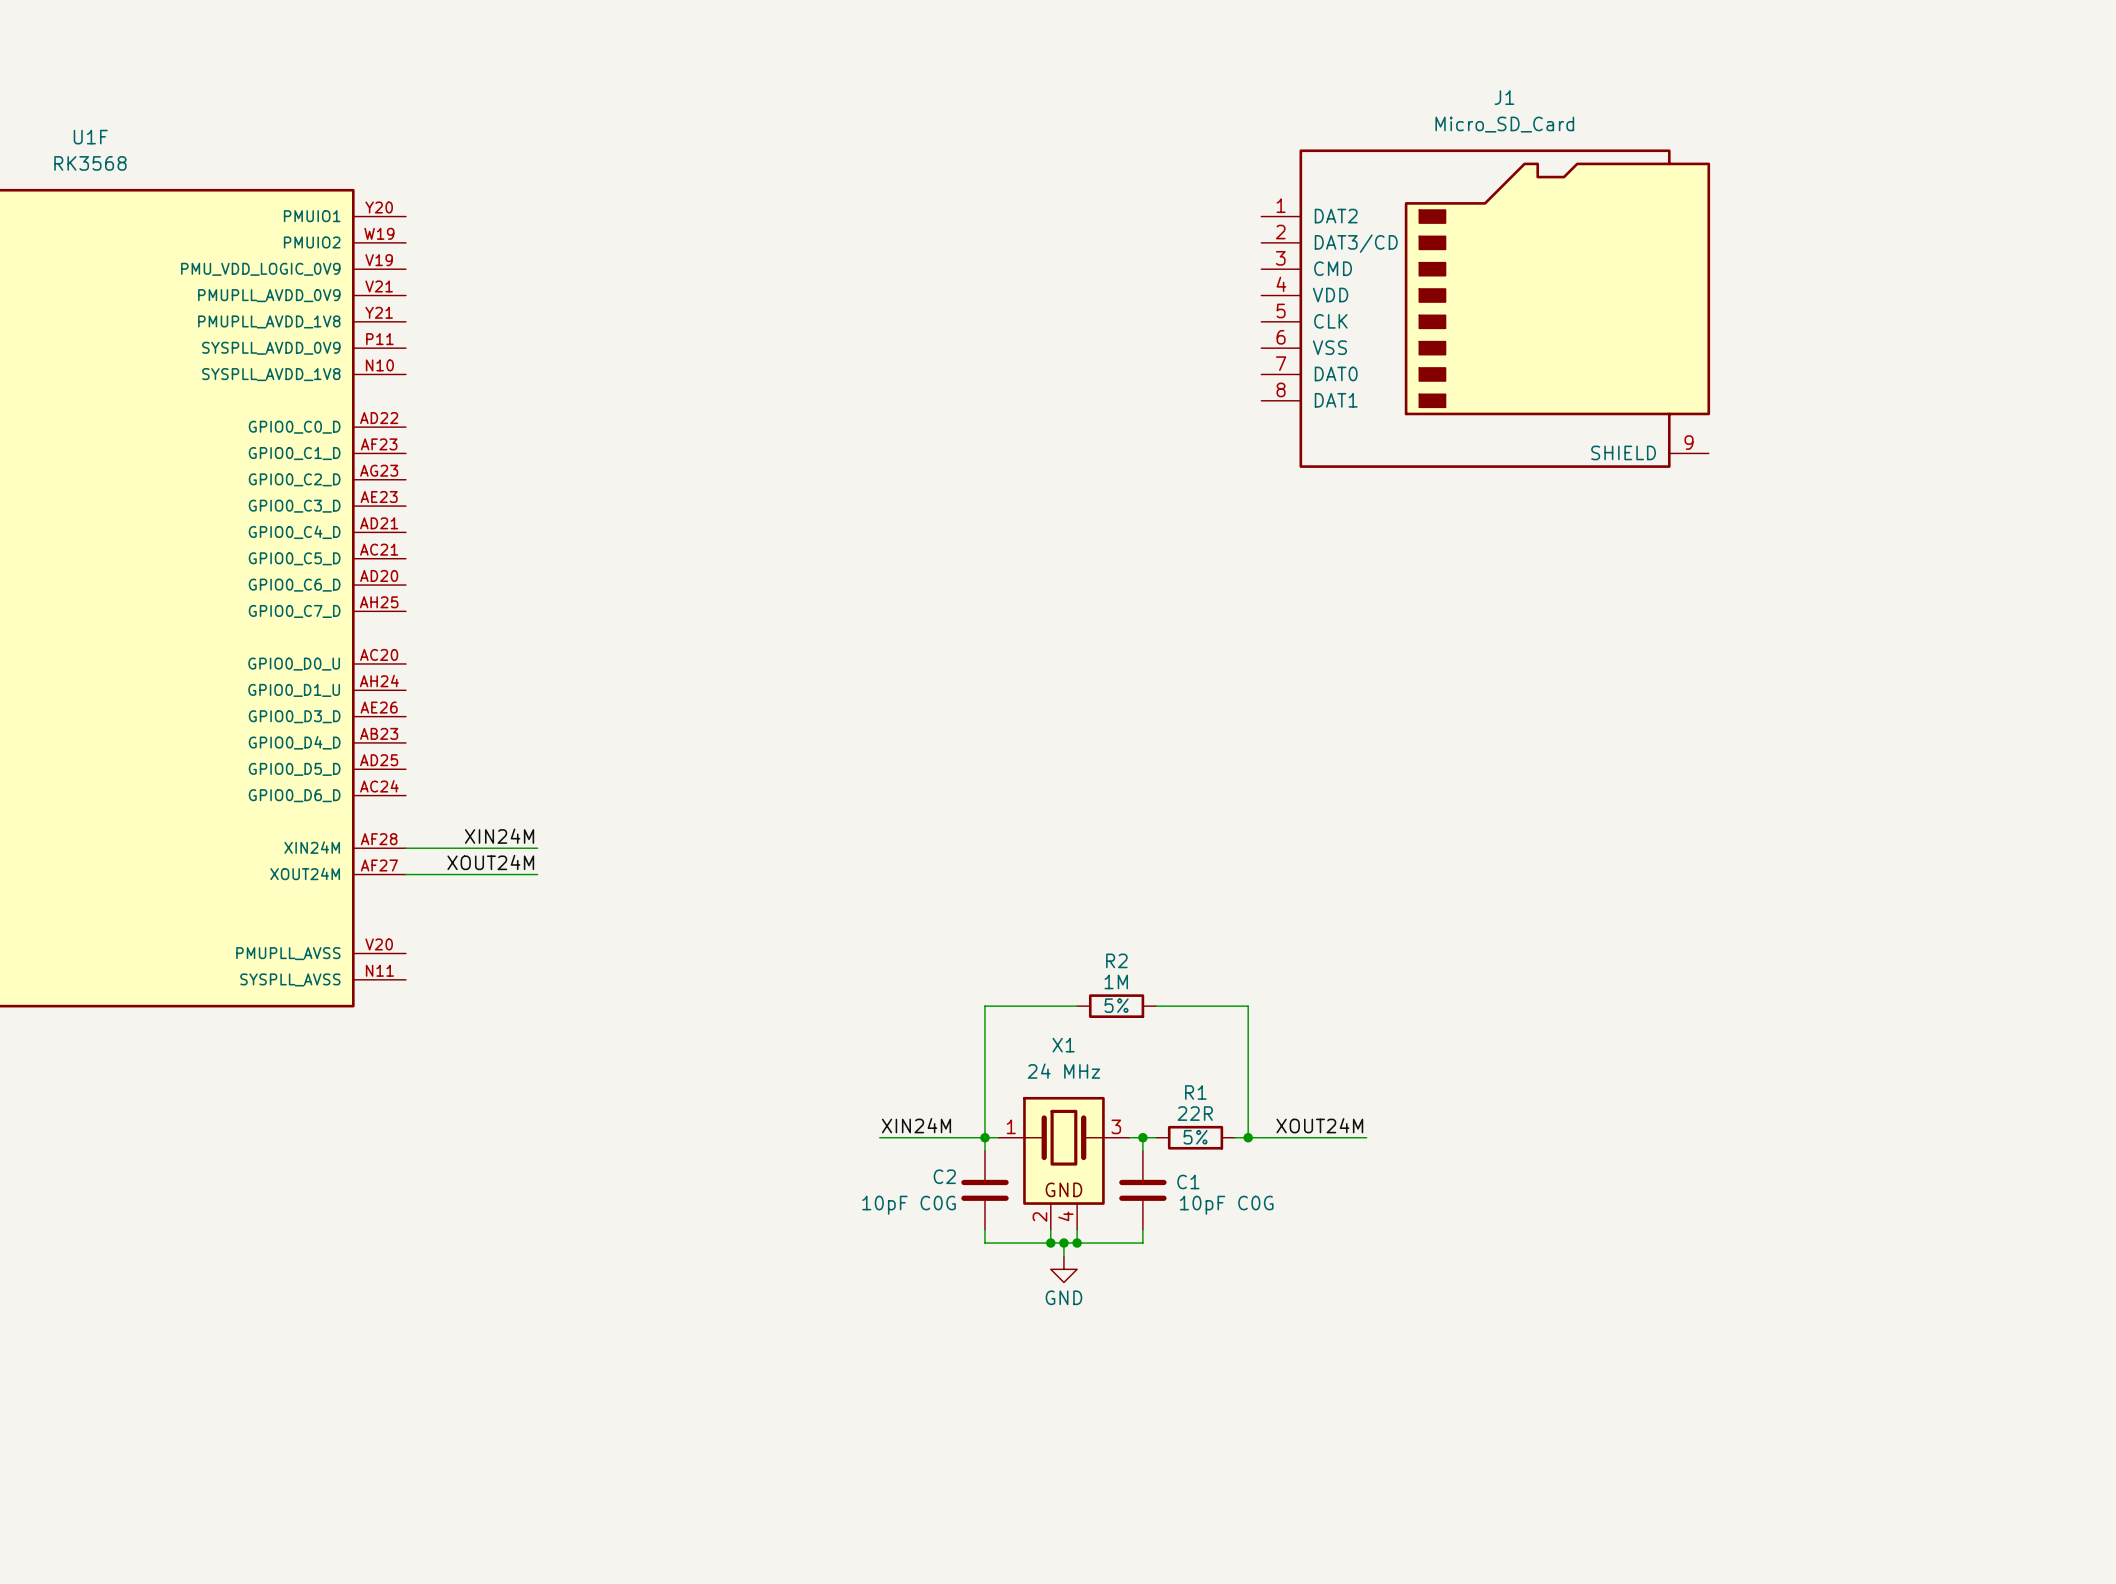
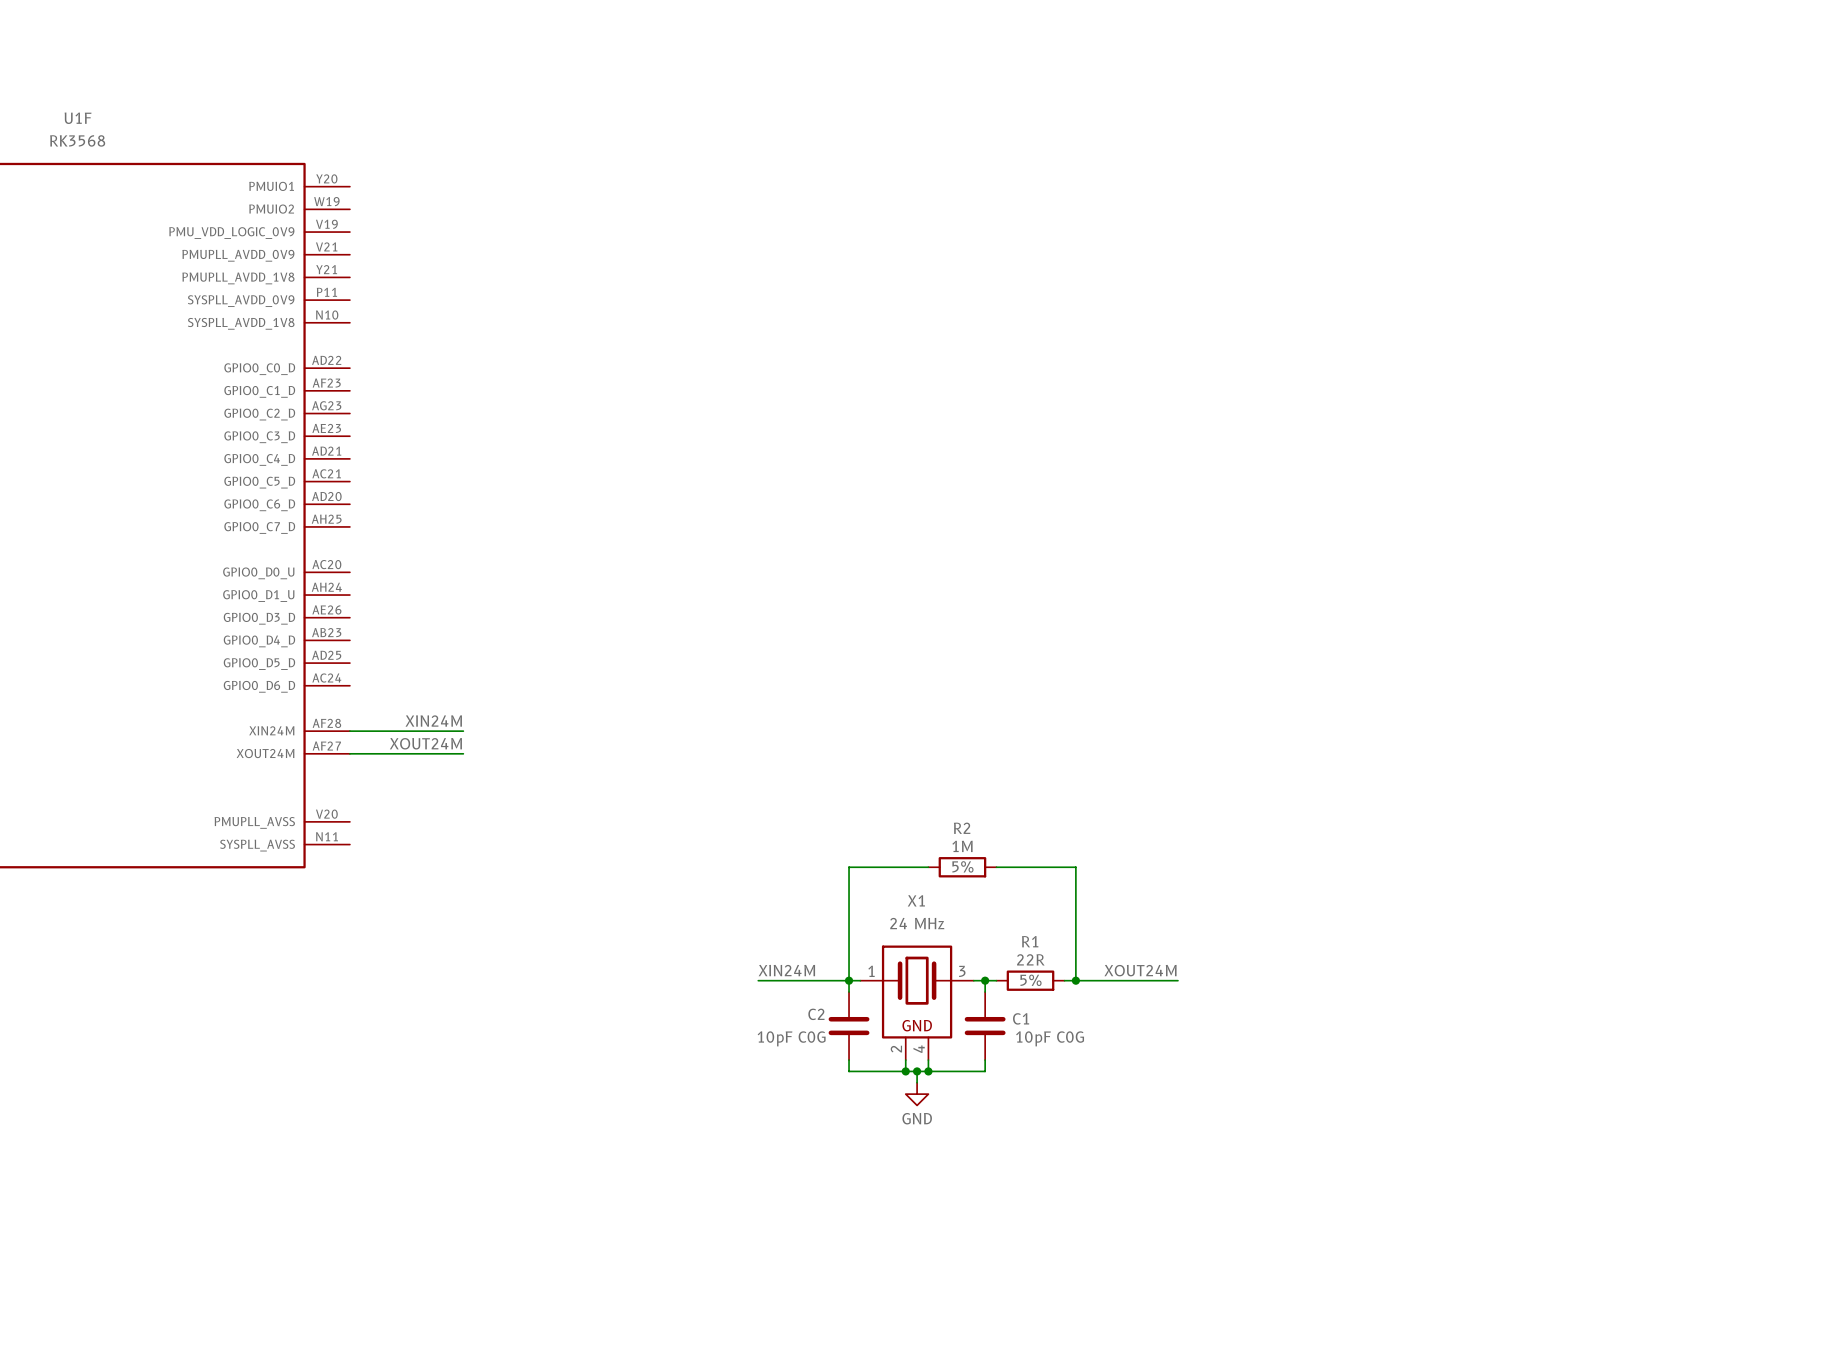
J1: Micro_SD_Card (1485, 308) -> none

